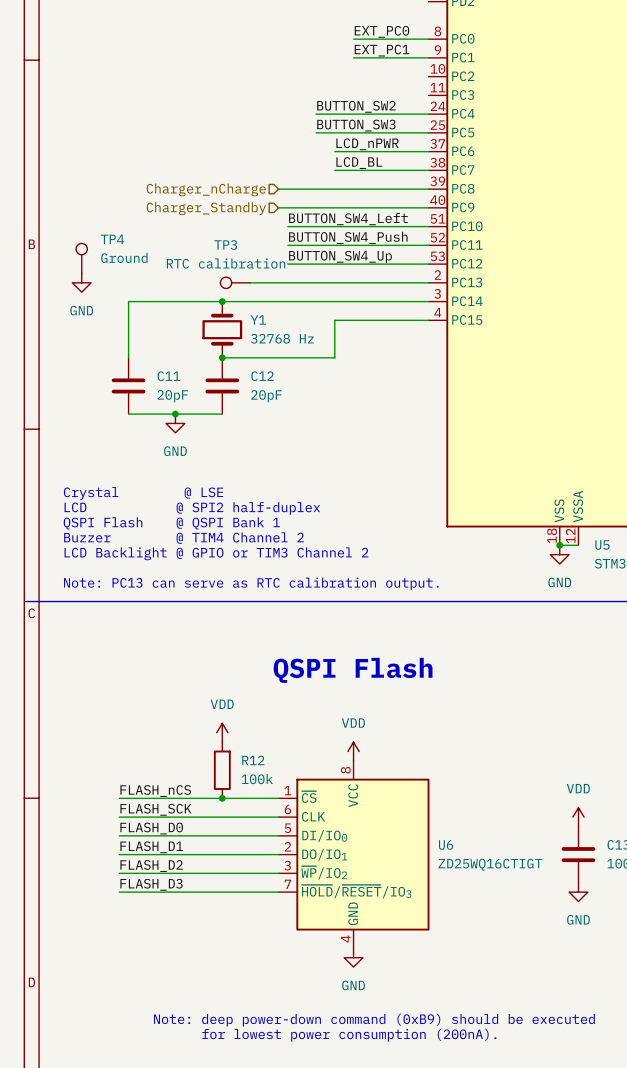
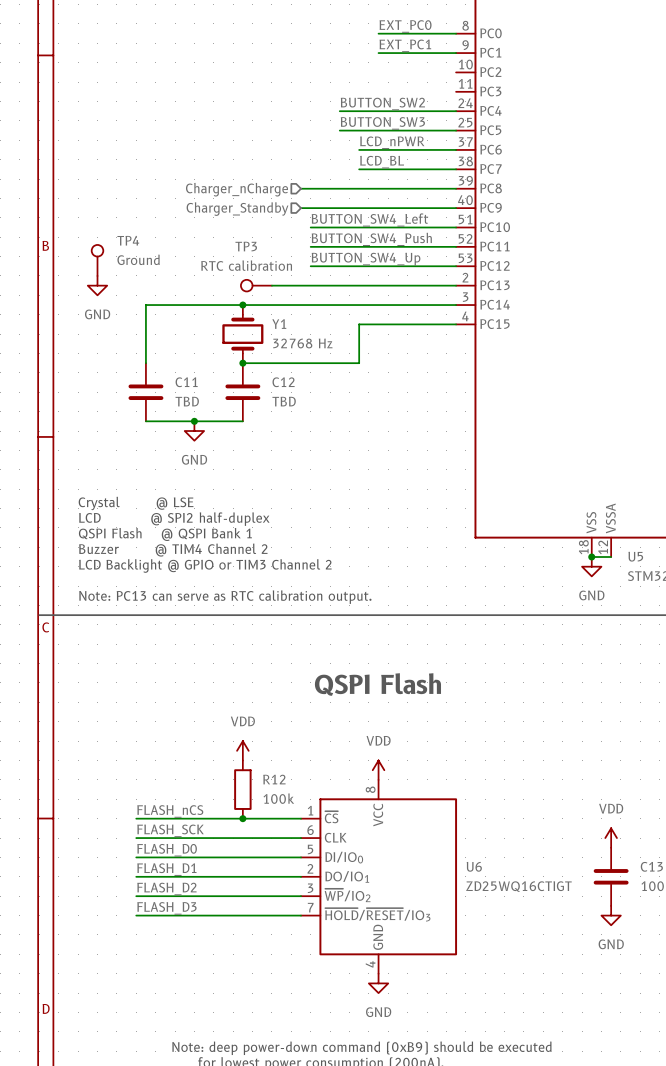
C11 value: 20pF (172, 396) -> TBD (187, 401)
C12 value: 20pF (266, 396) -> TBD (284, 401)

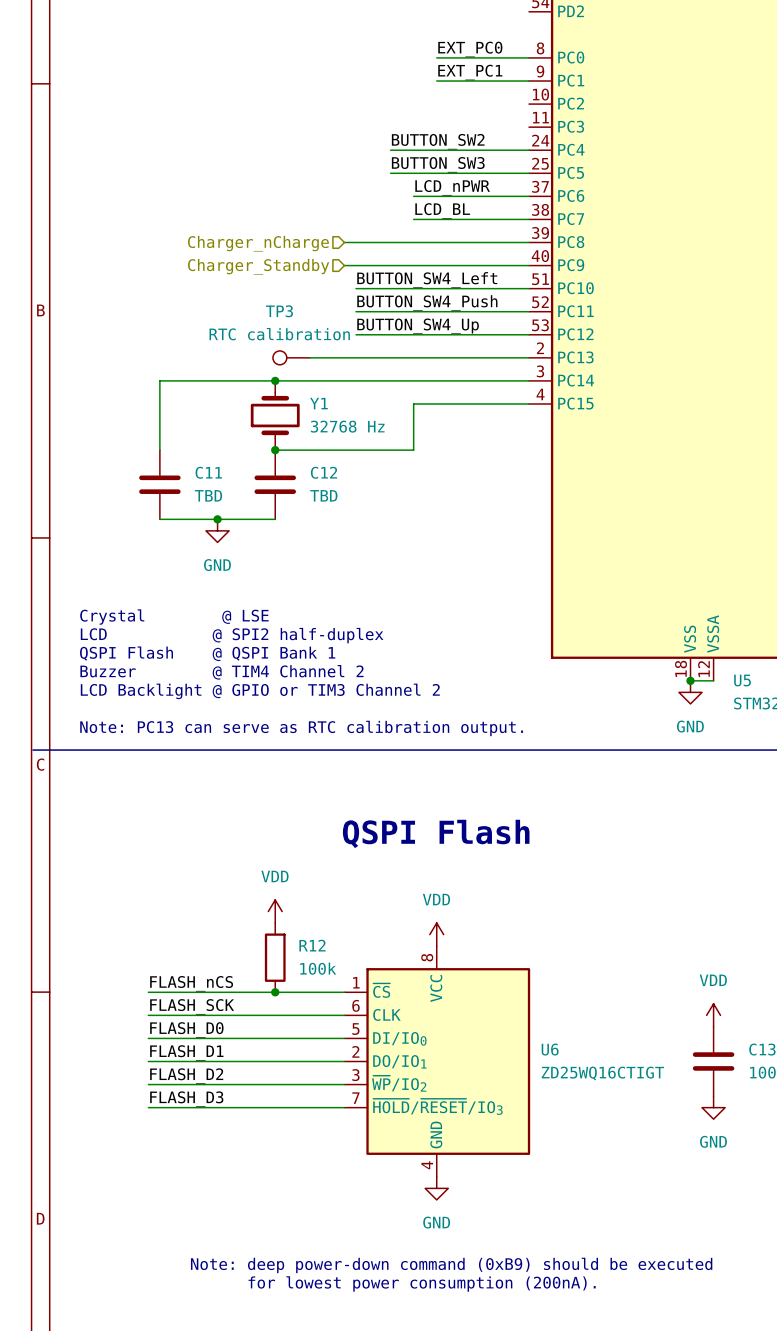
TP4: Ground (97, 260) -> none
power symbol: GND (97, 285) -> none

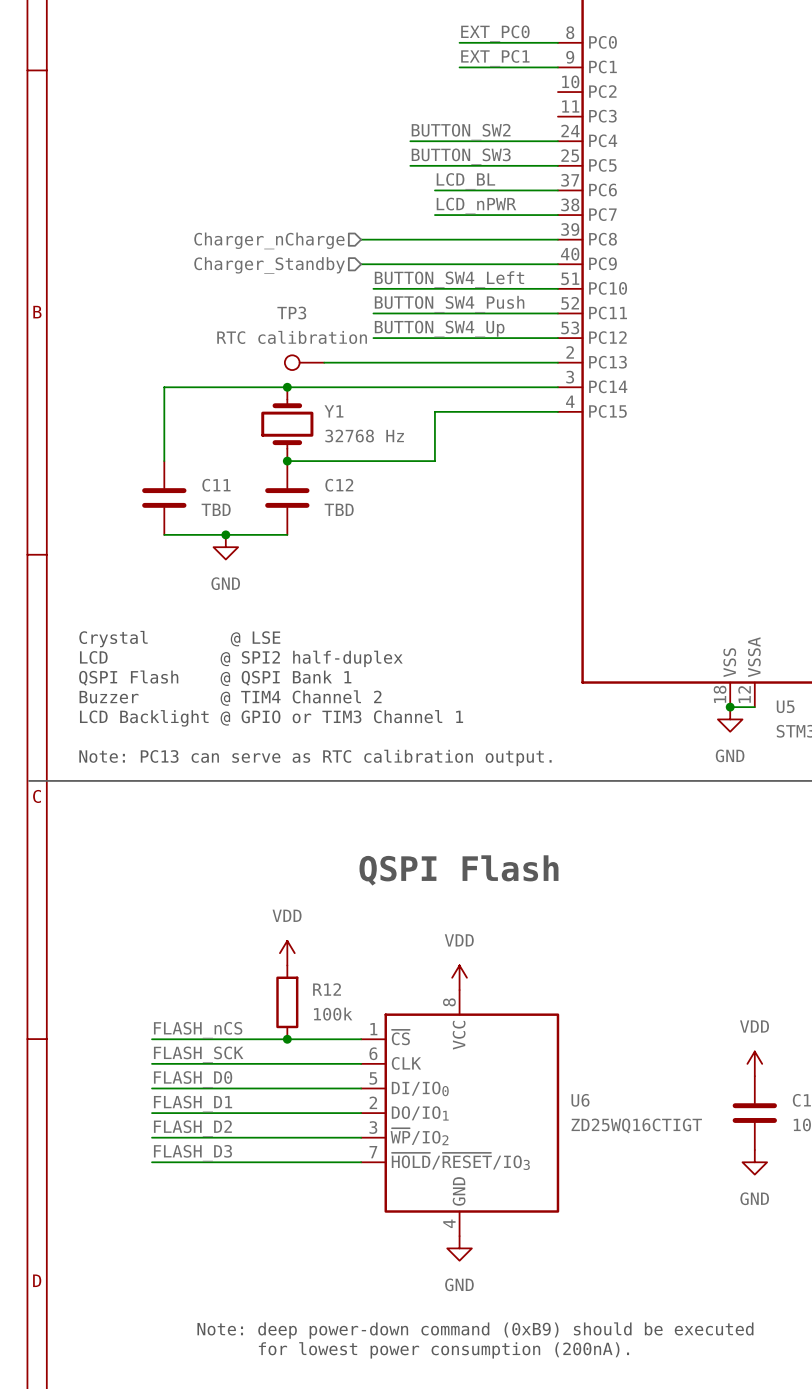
label: LCD_nPWR (452, 187) -> LCD_BL (465, 181)
label: LCD_BL (442, 210) -> LCD_nPWR (476, 205)
text: LCD Backlight @ GPIO or TIM3 Channel 2 (260, 691) -> LCD Backlight @ GPIO or TIM3 Channel 1 (271, 718)

